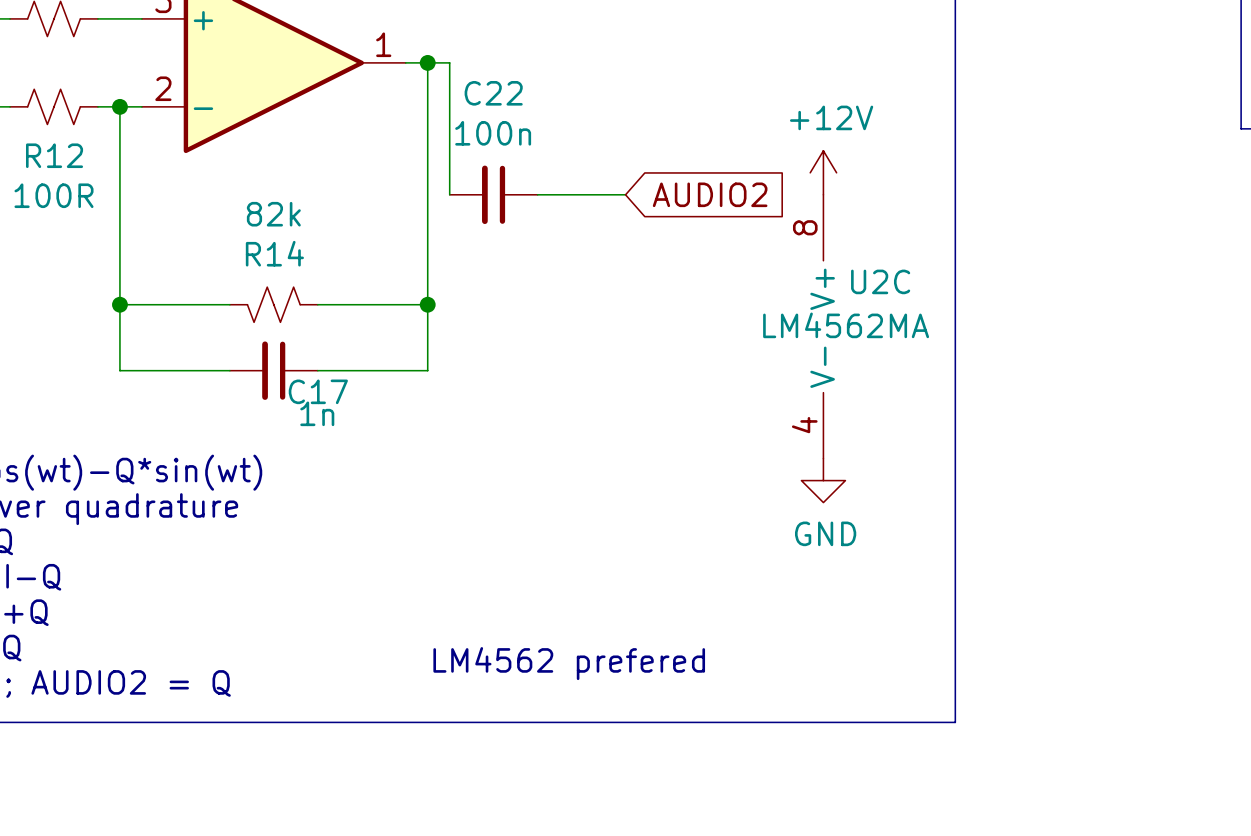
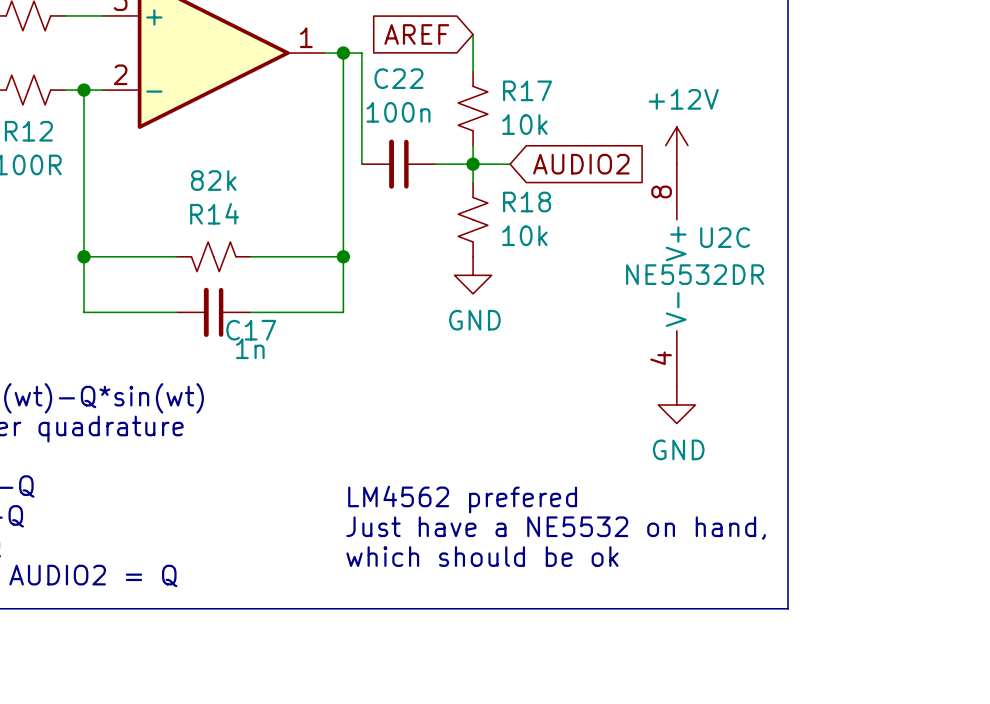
global label: none -> AREF (416, 34)
wire: none -> (473, 34) (473, 71)
R17: none -> 10k (473, 108)
wire: none -> (473, 145) (473, 182)
junction: none -> (473, 164)
R18: none -> 10k (473, 219)
U2C value: LM4562MA (846, 325) -> NE5532DR (695, 274)
power symbol: none -> GND (473, 275)
text: none -> LM4562 prefered (462, 499)
text: none -> Just have a NE5532 on hand, (556, 528)
text: LM4562 prefered (569, 663) -> which should be ok (482, 556)

